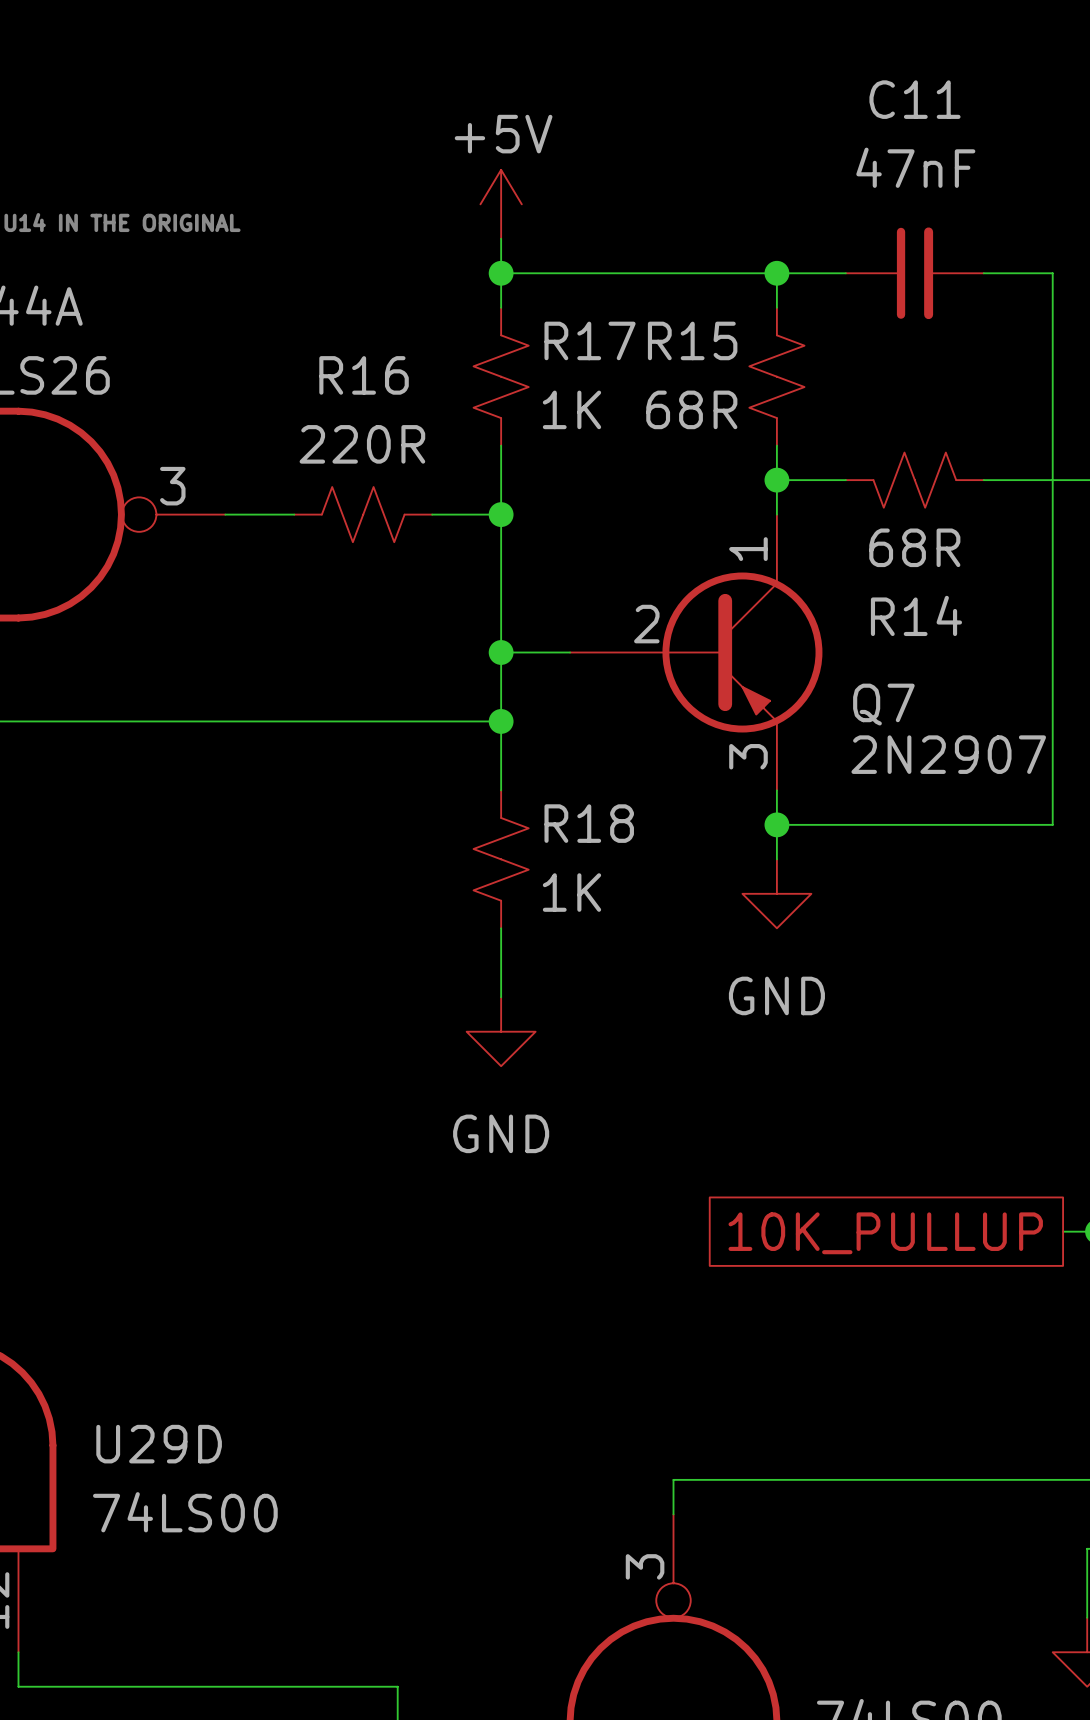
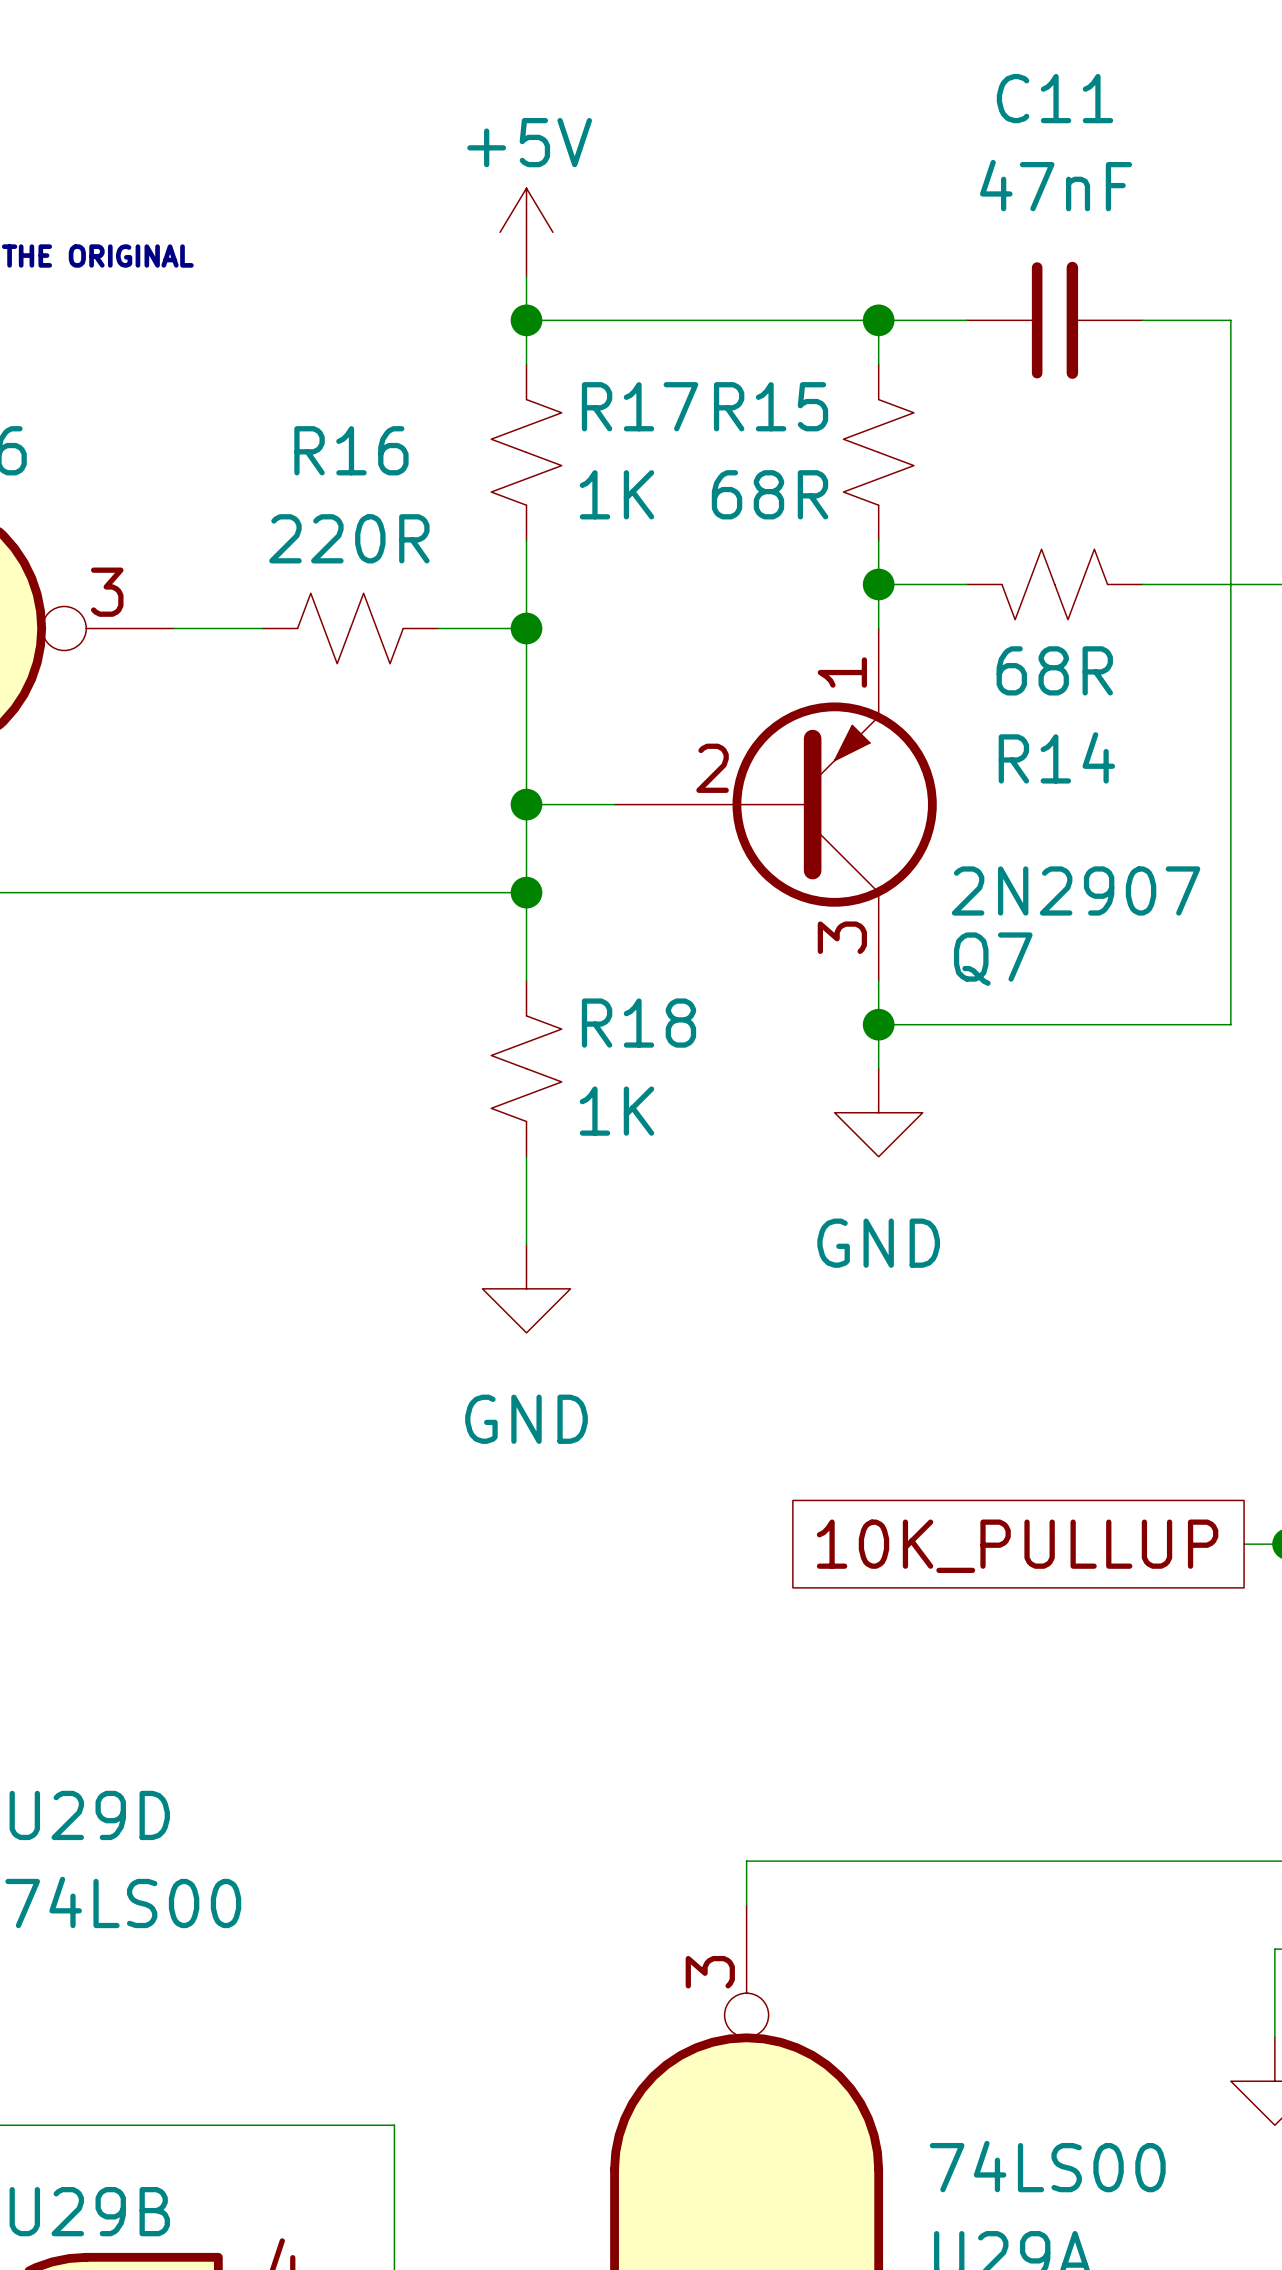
Q7 symbol: [570, 514, 823, 791] -> [614, 628, 937, 981]
Q7 name position: Q7 (883, 704) -> Q7 (993, 959)
Q7 value position: 2N2907 (948, 754) -> 2N2907 (1076, 890)

